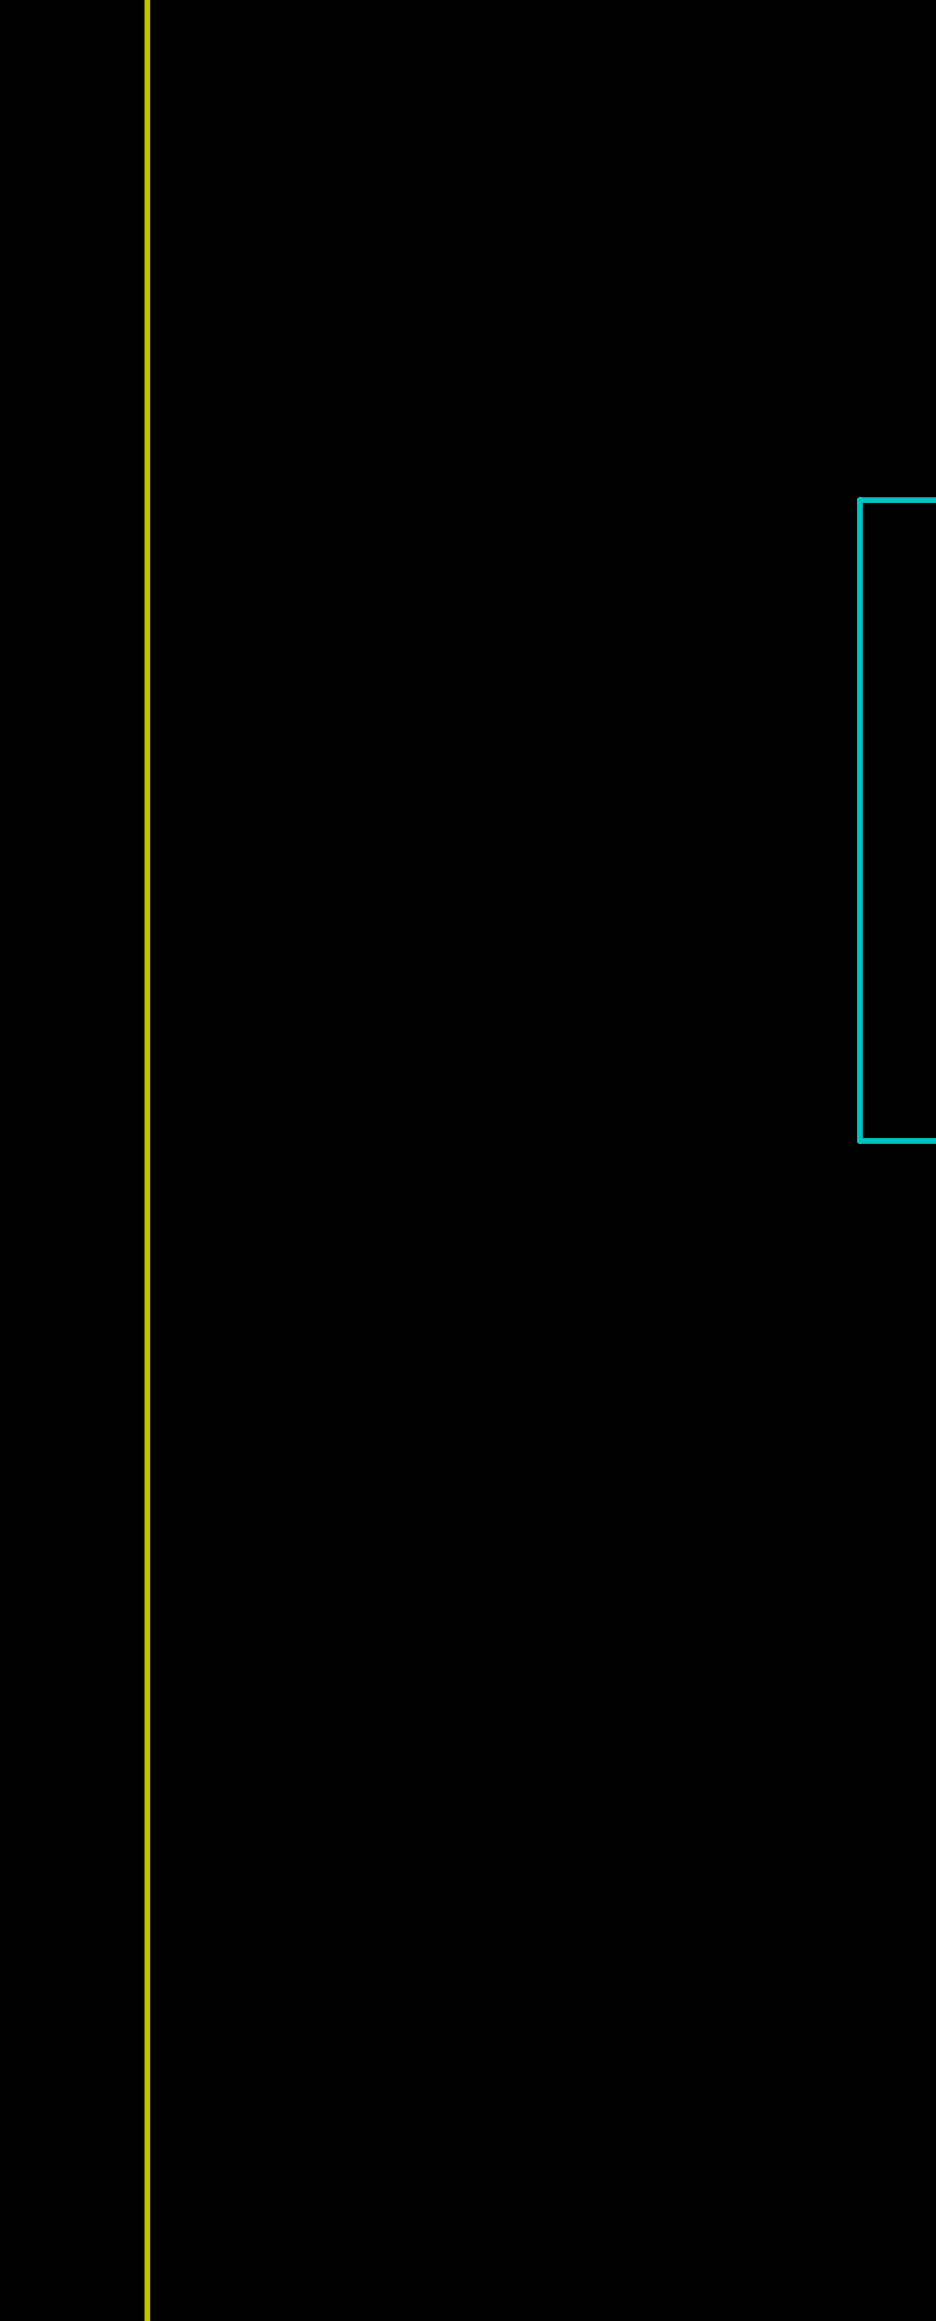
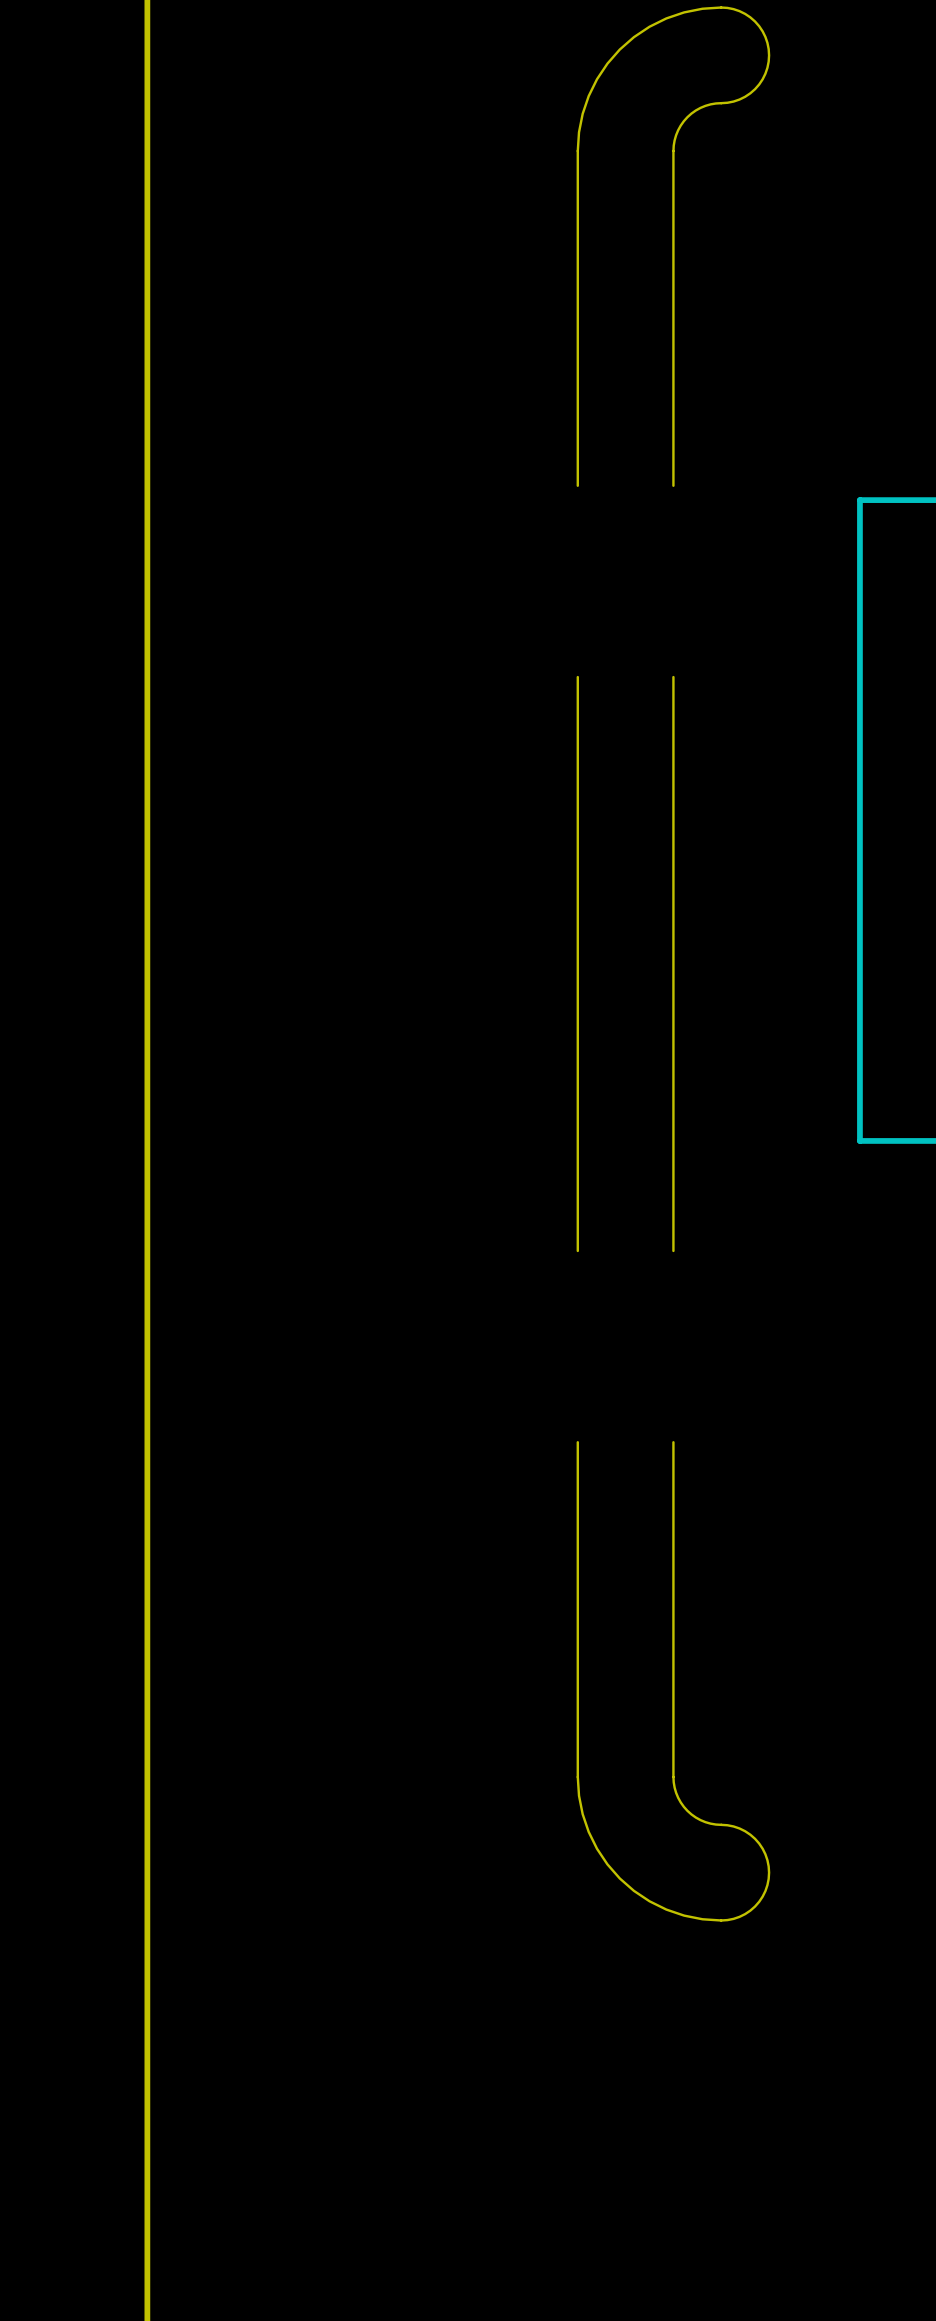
board edge: none -> (577, 485) (577, 150) (582, 113) (588, 96) (607, 63) (633, 37) (649, 26) (684, 12) (702, 8) (727, 7) (745, 13) (759, 26) (767, 42) (768, 61) (762, 79) (750, 93) (733, 101) (710, 104) (695, 110) (680, 125) (674, 140) (673, 485)
board edge: none -> (577, 677) (577, 1250)
board edge: none -> (673, 677) (673, 1250)
board edge: none -> (577, 1442) (577, 1777) (582, 1814) (597, 1848) (607, 1864) (633, 1890) (666, 1909) (684, 1915) (702, 1919) (727, 1920) (745, 1914) (759, 1901) (767, 1885) (768, 1866) (762, 1848) (750, 1834) (733, 1826) (710, 1823) (695, 1817) (680, 1802) (674, 1787) (673, 1442)

